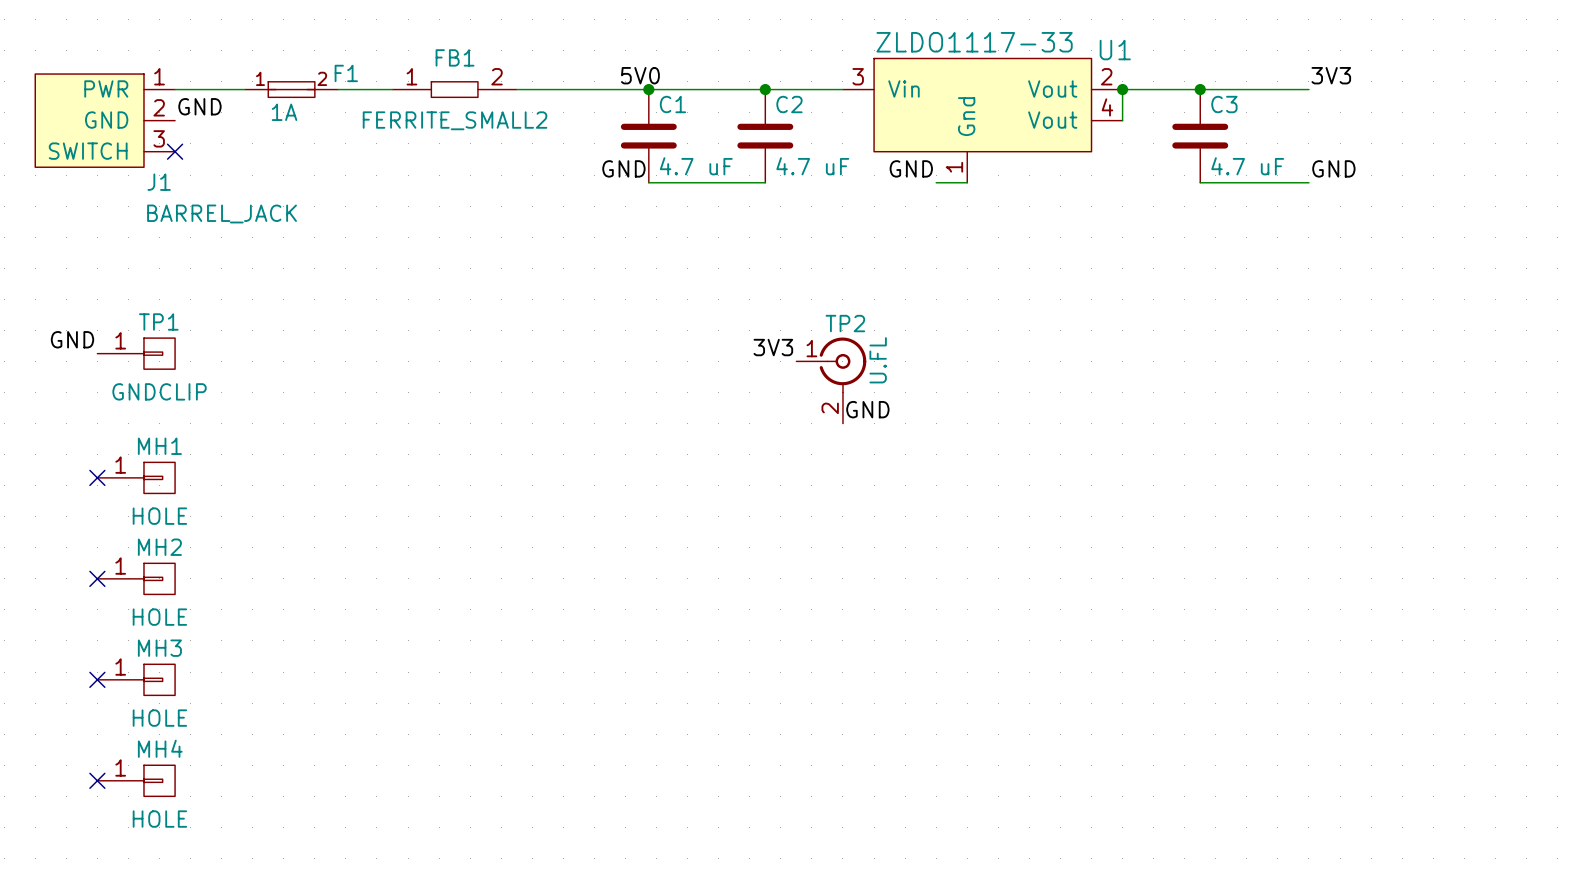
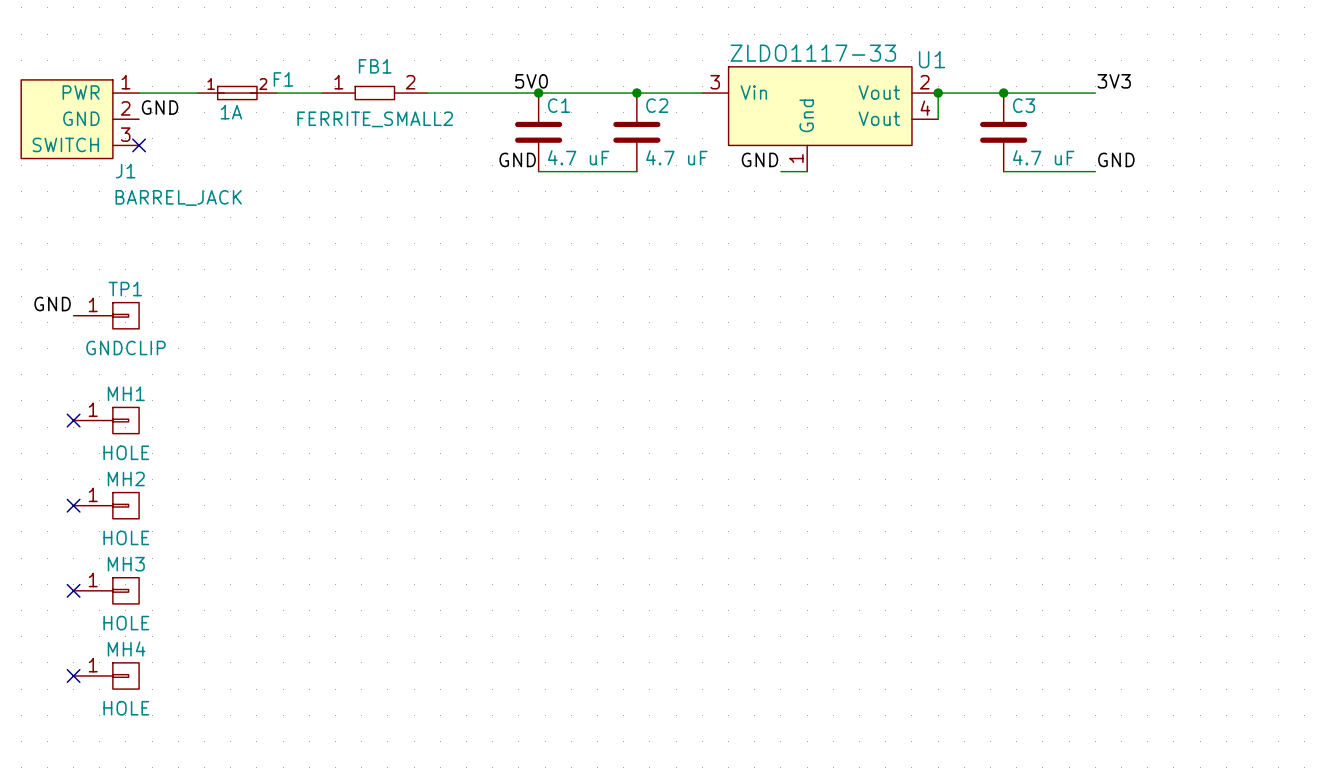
label: 3V3 (773, 347) -> none
TP2: U.FL (831, 380) -> none
label: GND (867, 409) -> none

